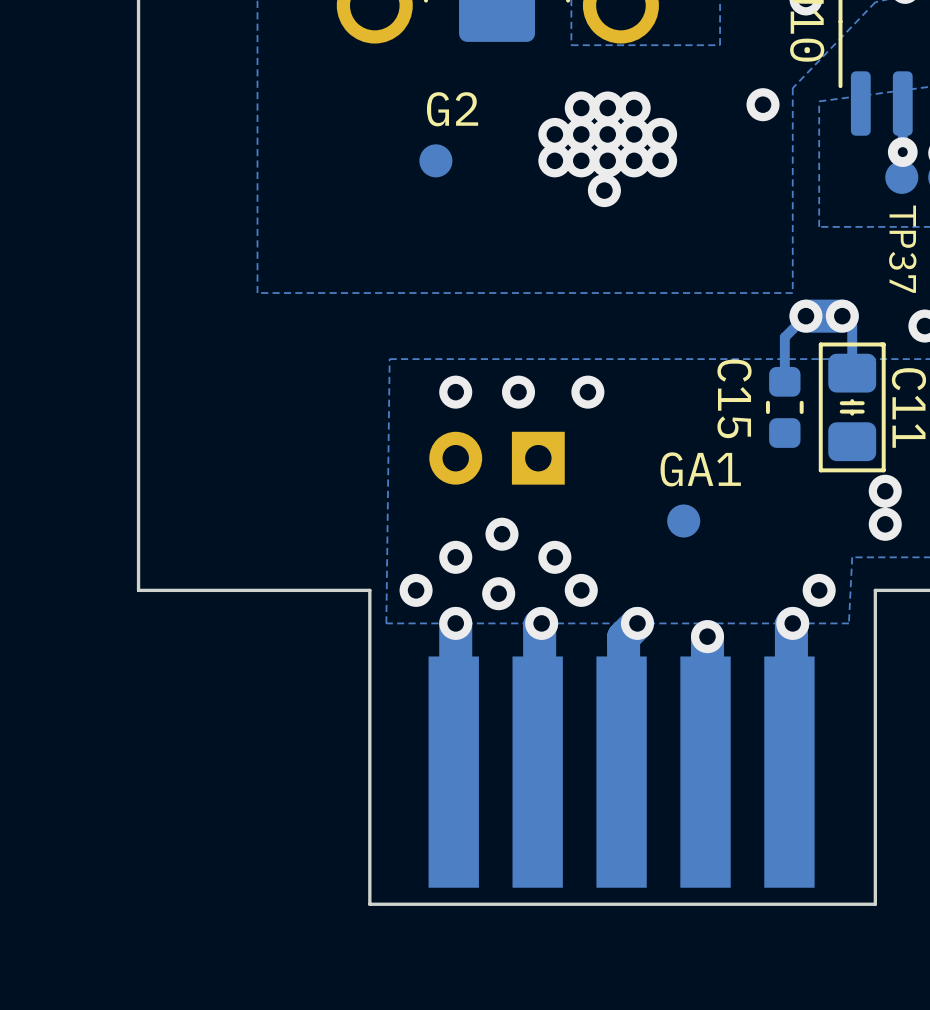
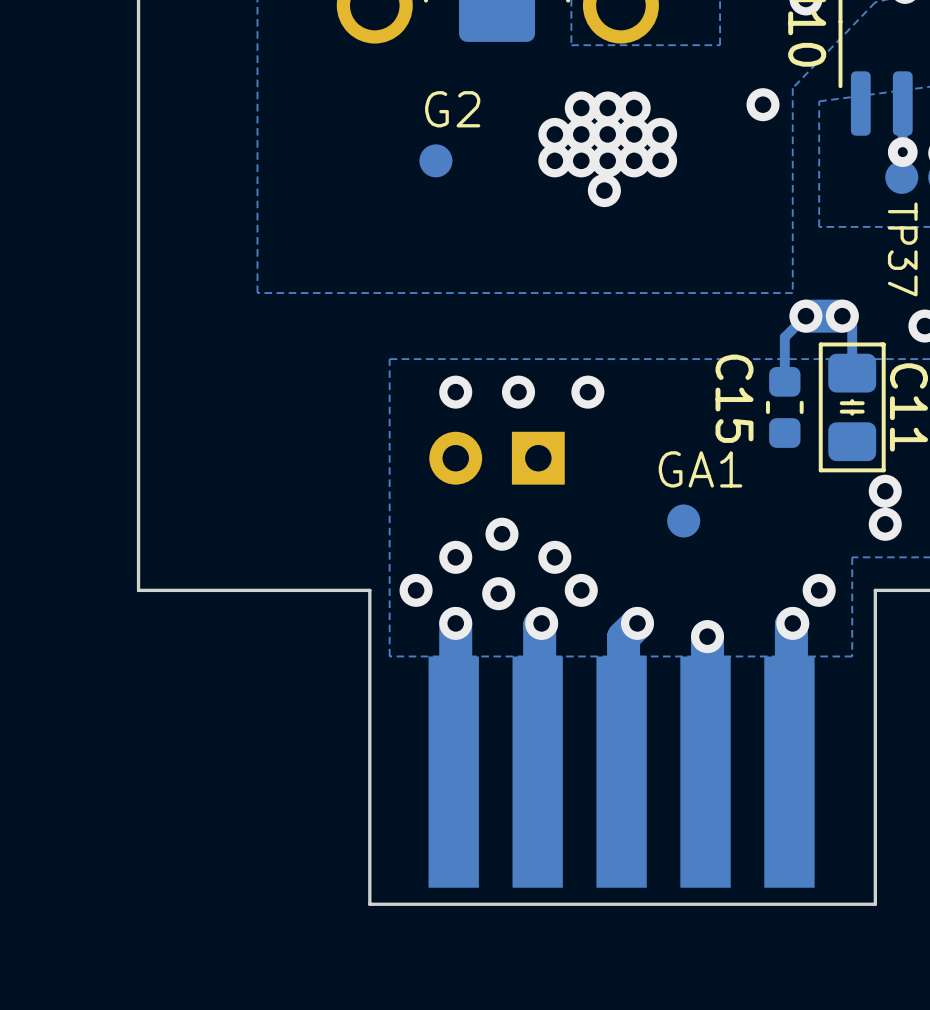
zone outline: (389, 359) (386, 623) (848, 623) (852, 557) -> (389, 359) (389, 656) (852, 656) (852, 557)

